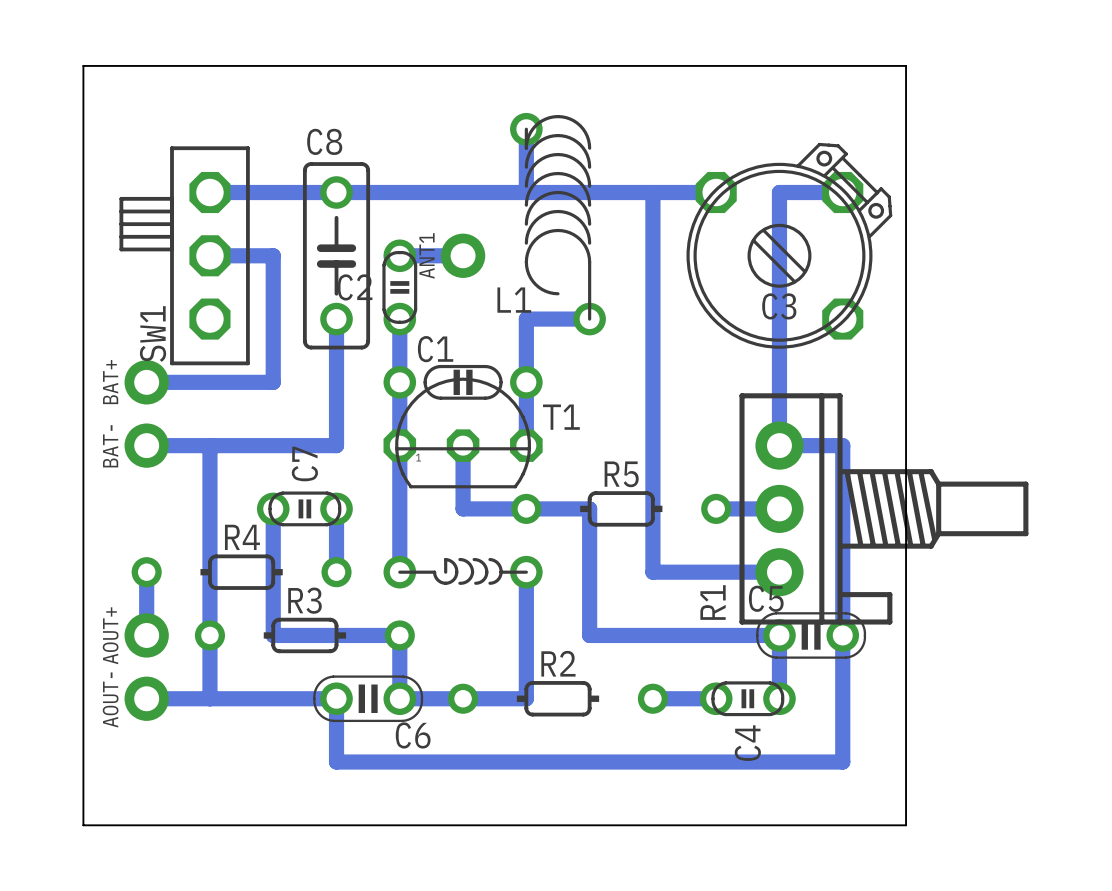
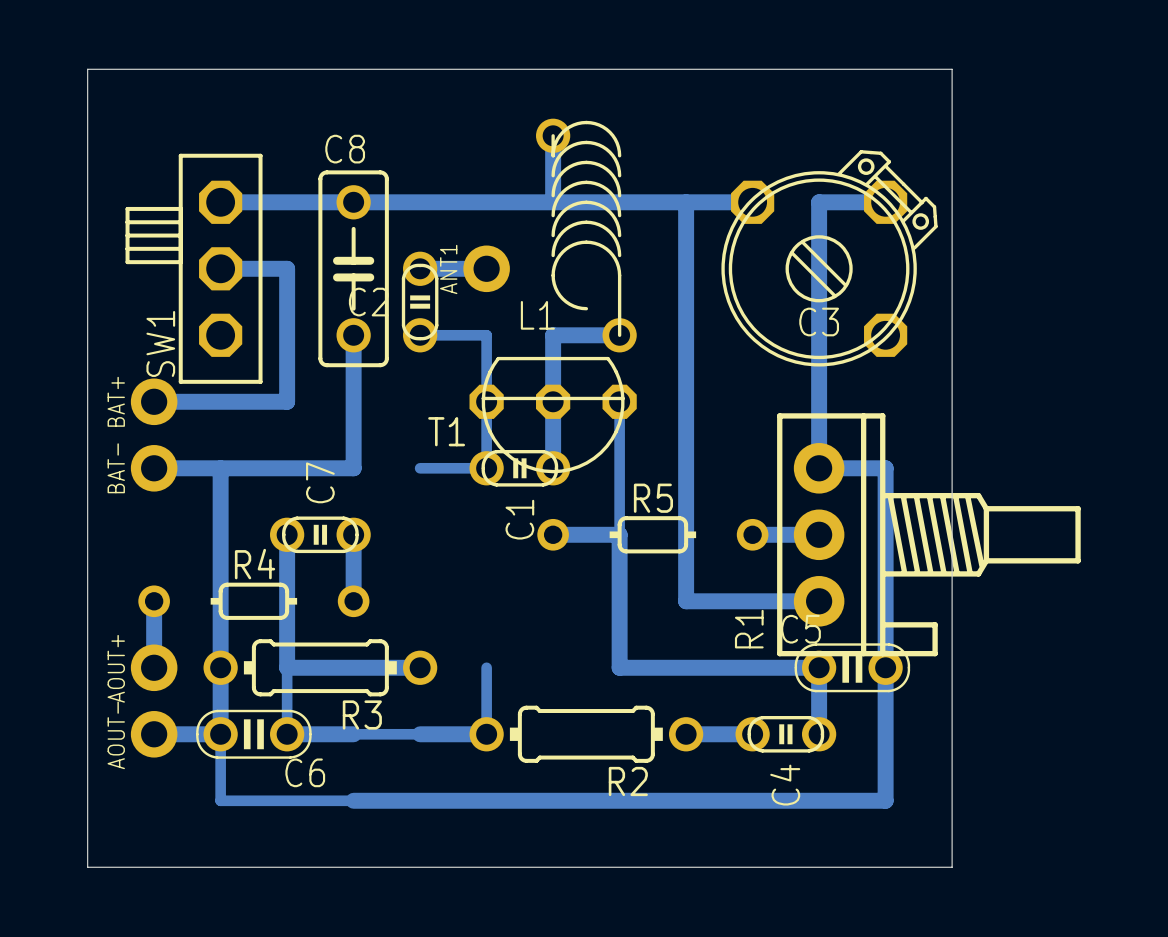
bottom track: (399, 319) (399, 572) -> (420, 335) (486, 335) (486, 468) (420, 468)
C1 name position: C1 (435, 349) -> C1 (519, 519)
C1 footprint: [383, 364, 543, 400] -> [469, 450, 571, 487]
T1 footprint: [383, 377, 543, 489] -> [469, 356, 637, 474]
bottom track: none -> (619, 401) (619, 534)
T1 name position: T1 (561, 417) -> T1 (446, 431)
bottom track: (463, 445) (463, 508) (526, 508) -> none
part: (463, 572) -> none
bottom track: (526, 572) (526, 698) (463, 698) -> (486, 667) (486, 734)
R3 name position: R3 (305, 600) -> R3 (362, 714)
R3 footprint: [194, 617, 415, 654] -> [203, 639, 438, 697]
bottom track: (399, 635) (399, 698) -> (353, 734) (420, 734)
R2 name position: R2 (558, 663) -> R2 (628, 781)
R2 footprint: [448, 681, 668, 717] -> [469, 705, 704, 763]
bottom track: (209, 698) (273, 698) -> (287, 667) (287, 734)
bottom track: (336, 698) (336, 762) -> (220, 734) (220, 800) (353, 800)
C6 position: (368, 698) -> (253, 734)

